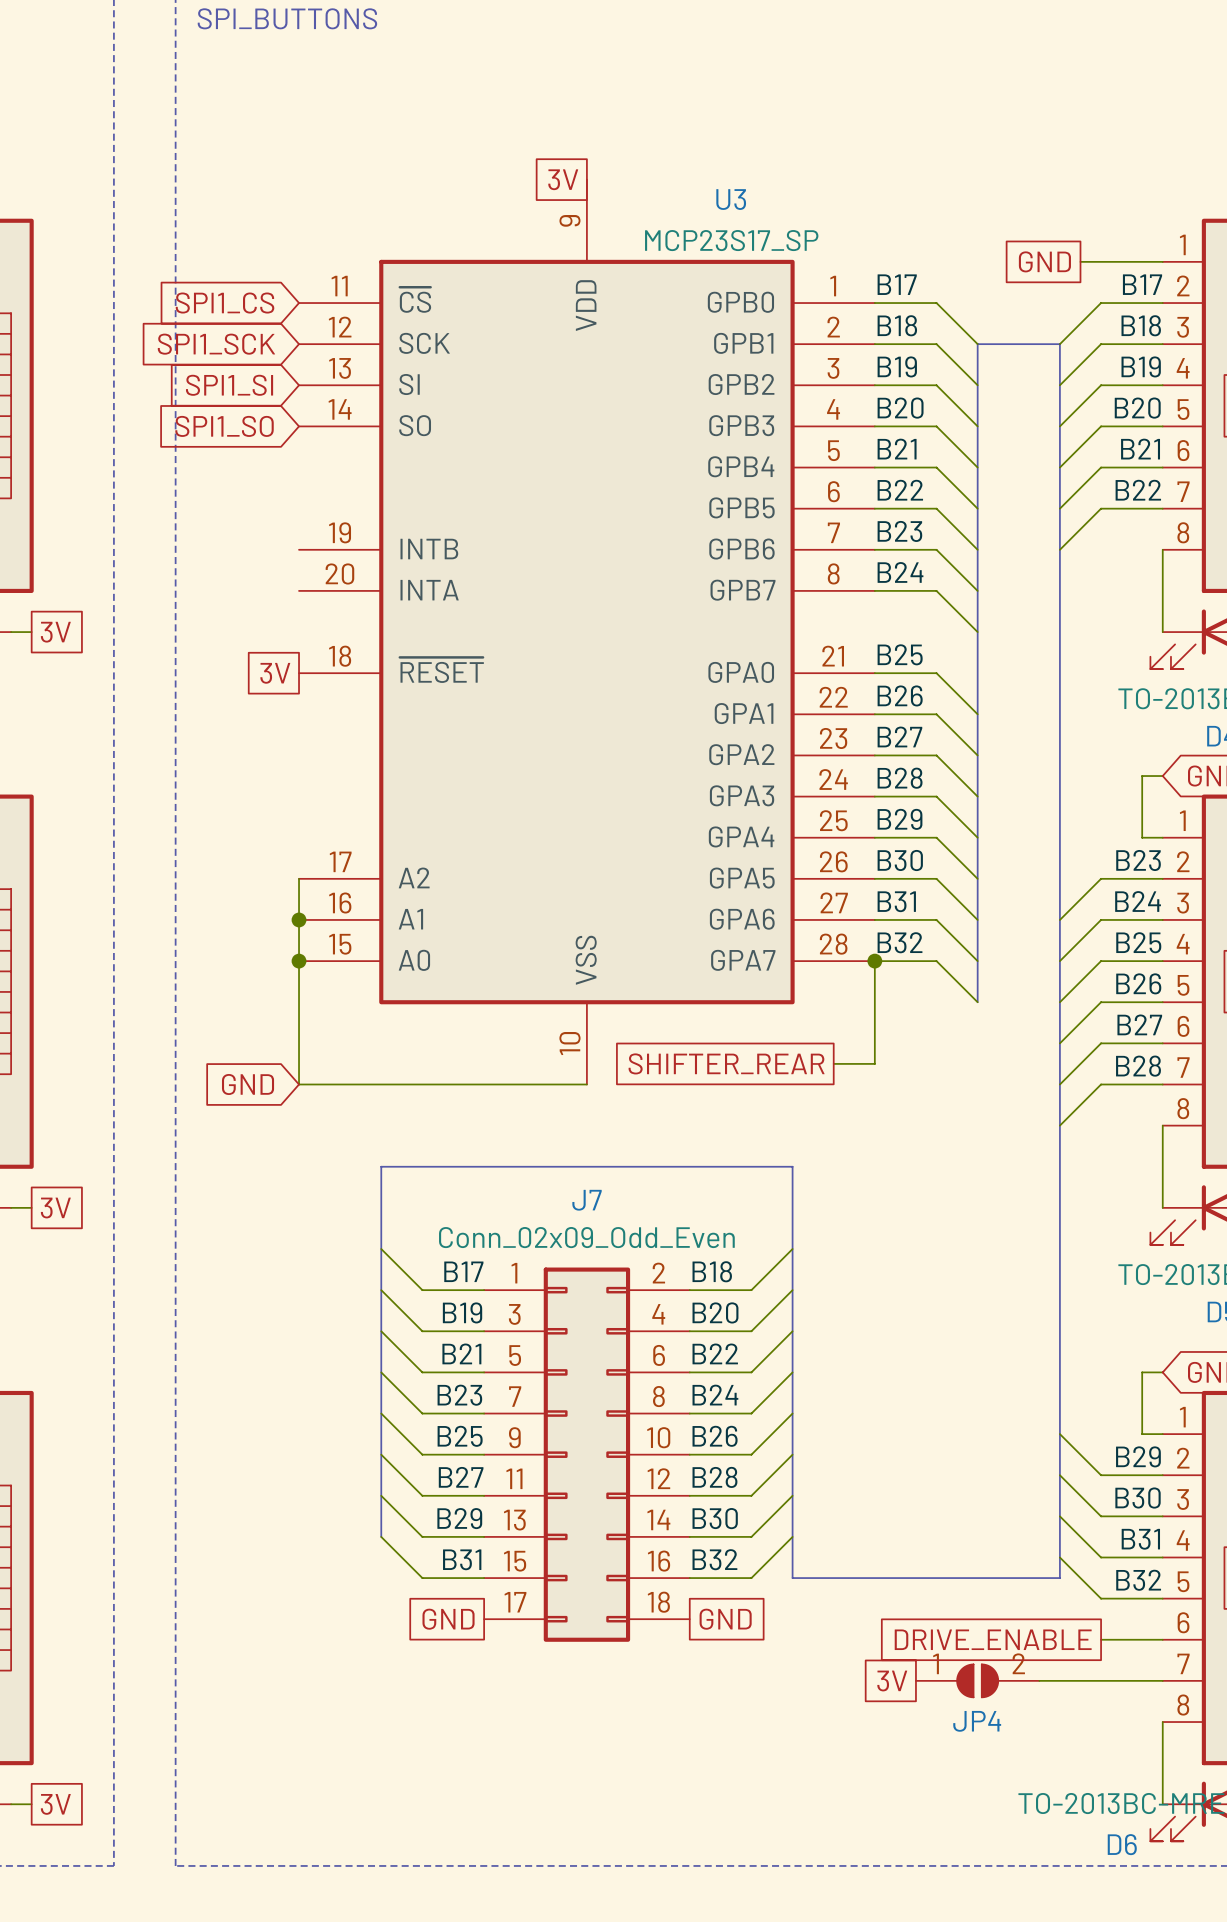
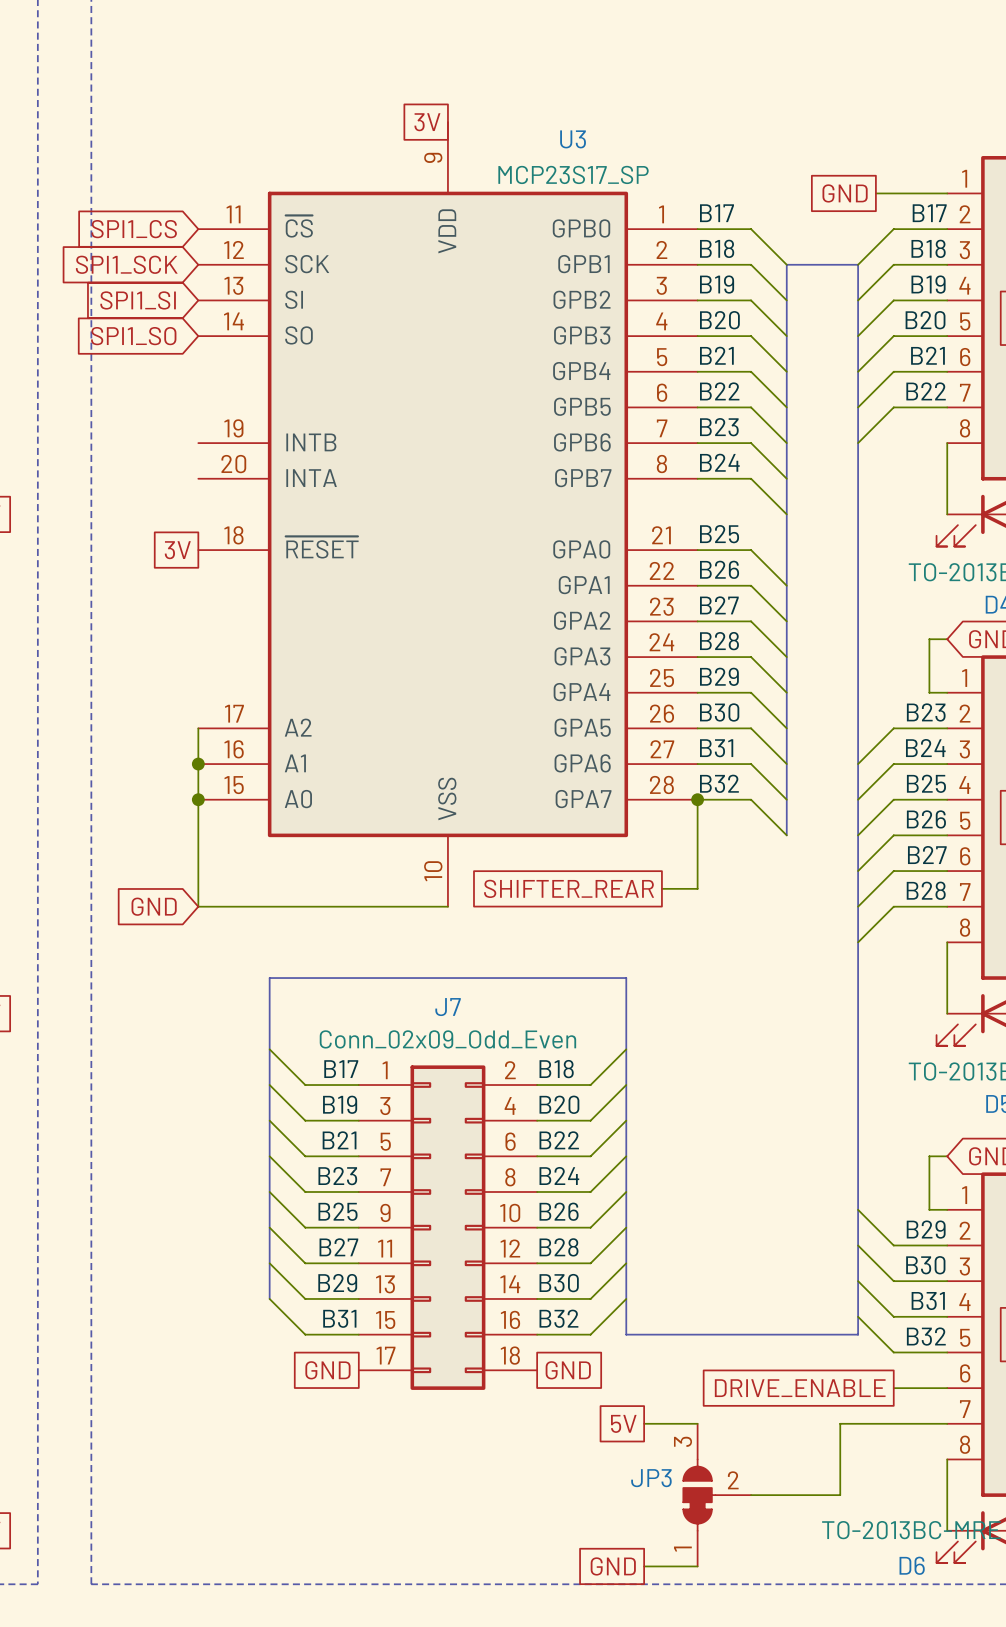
global label: none -> 5V (623, 1423)
wire: none -> (644, 1423) (697, 1423)
JP4: (977, 1680) -> none
wire: none -> (840, 1423) (840, 1495) (751, 1495)
global label: 3V (892, 1681) -> none
JP3: none -> (717, 1495)
global label: none -> GND (613, 1566)
wire: none -> (644, 1566) (697, 1566)

